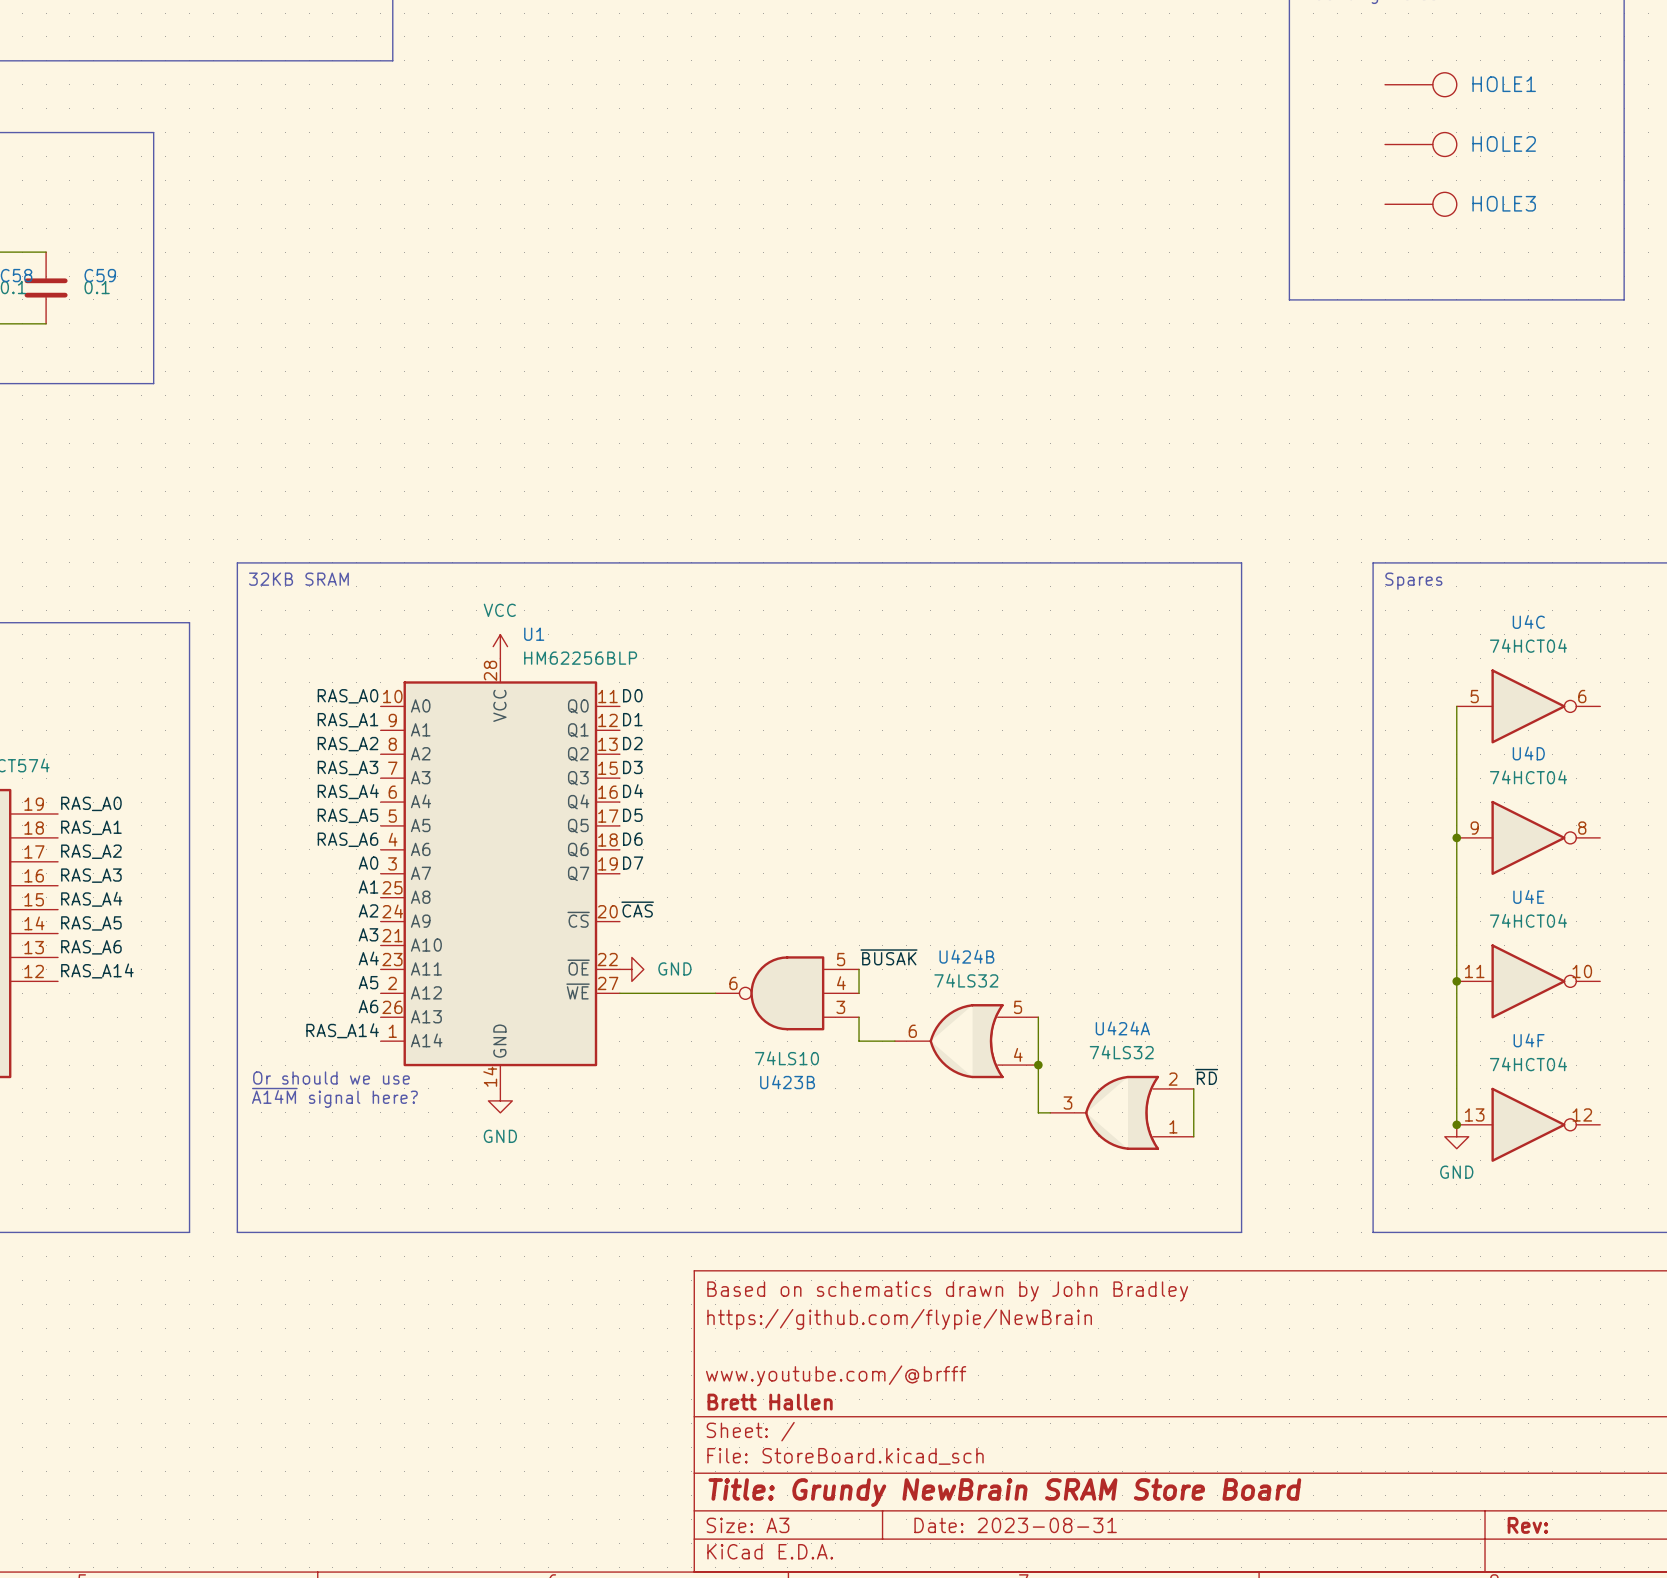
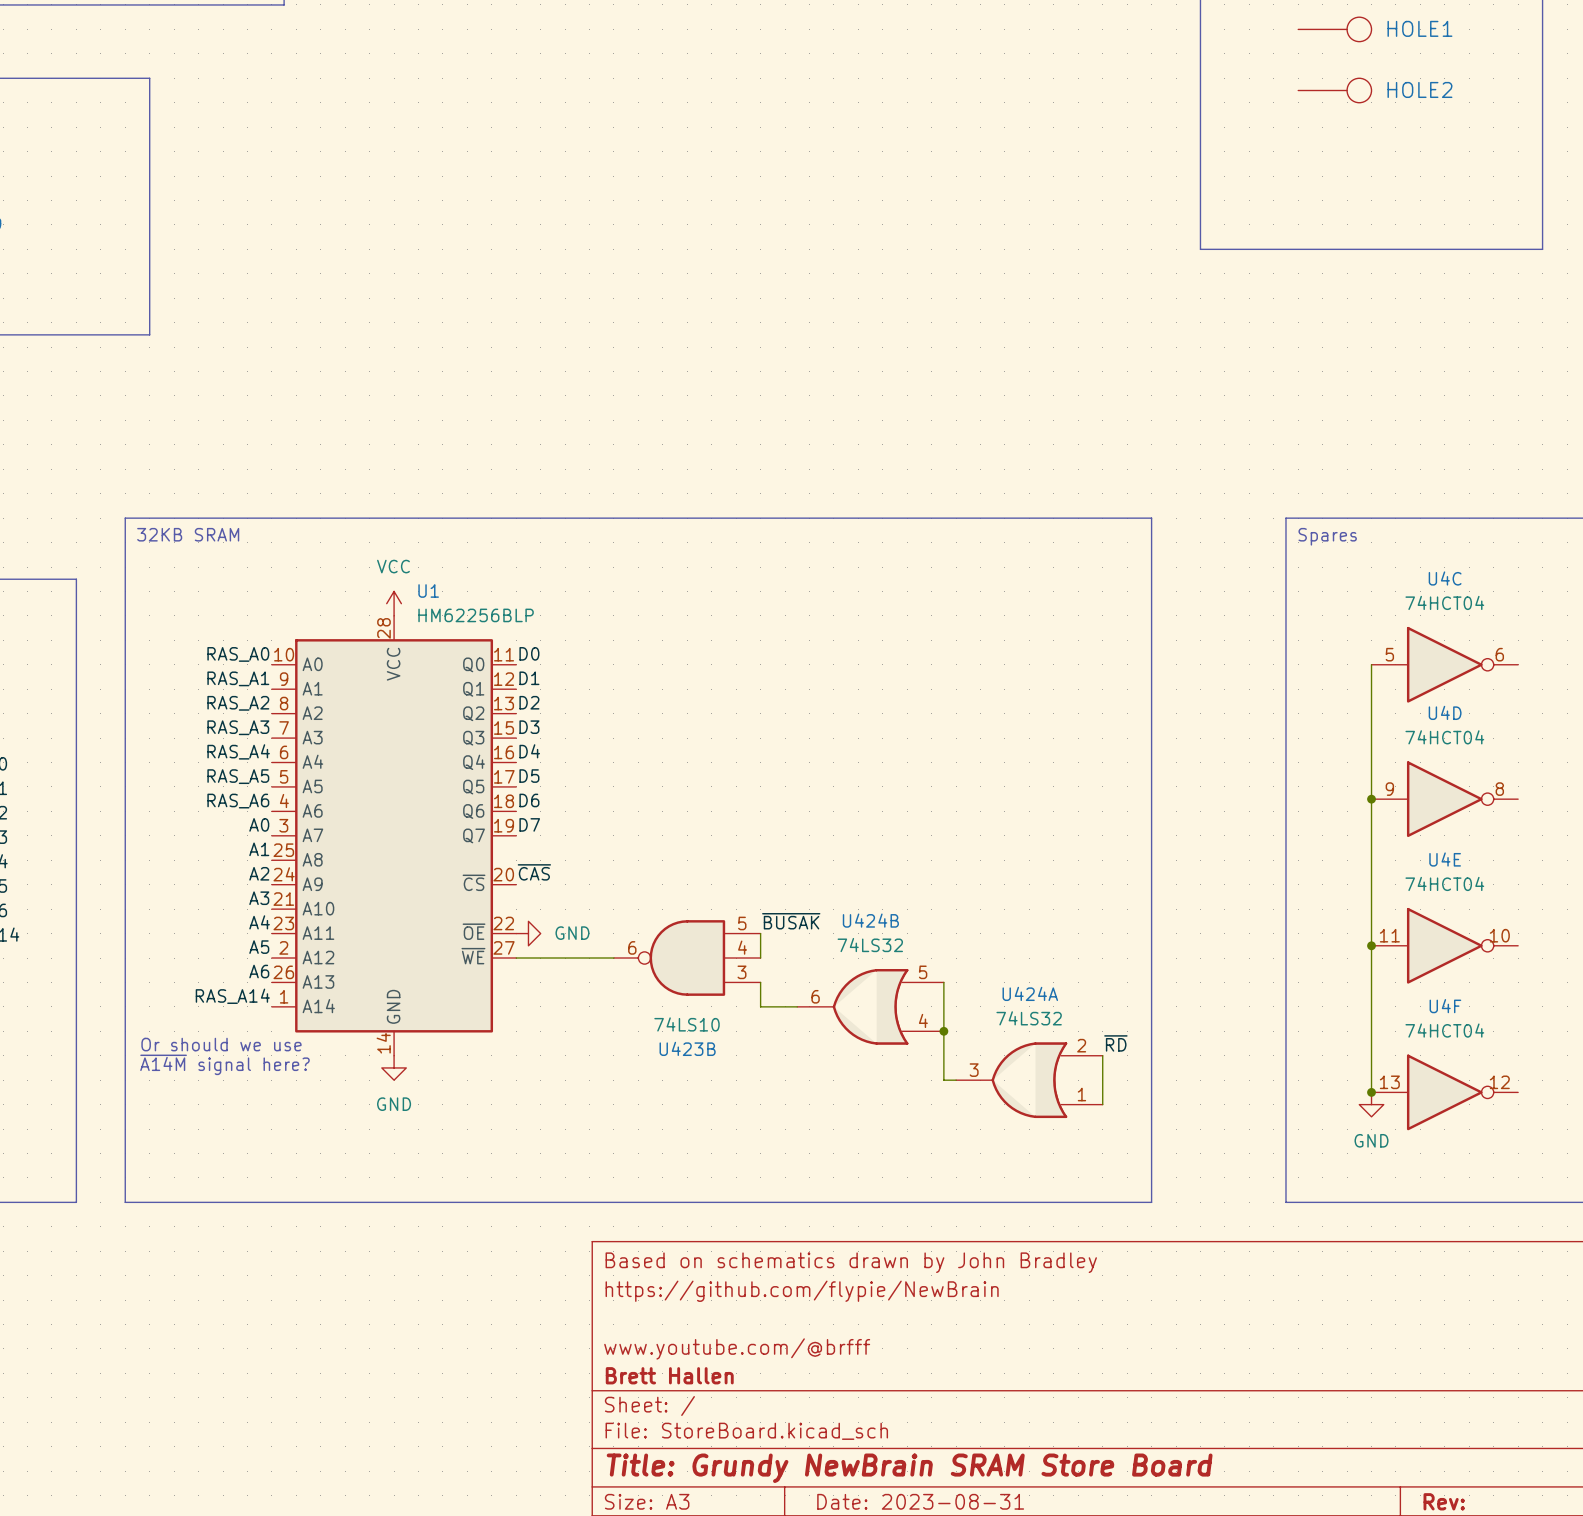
line: (153, 132) (153, 383) -> (39, 78) (149, 78) (149, 334) (39, 334)
HOLE3: (1420, 204) -> none

